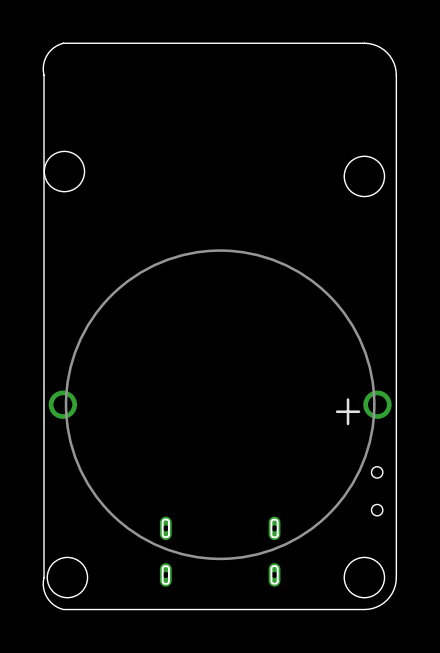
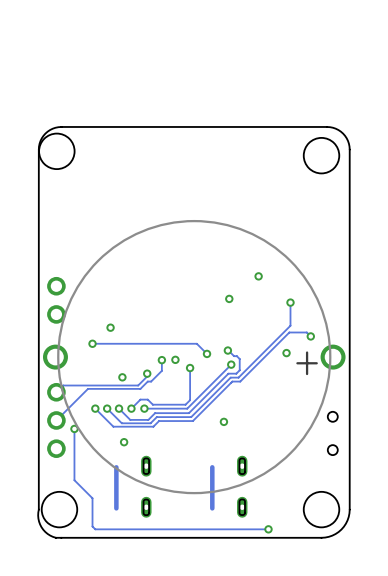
board edge: (396, 169) (395, 66) (389, 55) (383, 49) (372, 44) (364, 43) (60, 44) (49, 52) (43, 64) (44, 169) -> (349, 149) (347, 140) (343, 133) (335, 128) (327, 126) (58, 127) (50, 130) (43, 135) (38, 149)
via: none -> (258, 276)
via: none -> (229, 298)
part: none -> (56, 300)
track: none -> (290, 302) (290, 325) (238, 377) (230, 377) (191, 417) (156, 417) (150, 423) (121, 423) (107, 408)
via: none -> (290, 302)
via: none -> (110, 327)
track: none -> (310, 336) (306, 332) (289, 332) (240, 381) (232, 381) (192, 421) (159, 421) (153, 426) (113, 426) (95, 408)
via: none -> (310, 336)
track: none -> (92, 343) (196, 343) (207, 353)
via: none -> (92, 343)
track: none -> (227, 350) (239, 359) (239, 370) (236, 373) (228, 373) (188, 413) (155, 413) (148, 419) (130, 419) (119, 408)
via: none -> (227, 350)
via: none -> (286, 353)
via: none -> (207, 353)
via: none -> (175, 359)
track: none -> (161, 360) (161, 370) (140, 388) (88, 388) (56, 420)
via: none -> (161, 360)
track: none -> (231, 364) (187, 408) (144, 408)
via: none -> (231, 364)
track: none -> (190, 368) (190, 400) (185, 404) (152, 404) (147, 399) (140, 399) (131, 408)
via: none -> (190, 368)
track: none -> (147, 373) (147, 376) (138, 385) (63, 385) (56, 392)
via: none -> (147, 373)
via: none -> (122, 377)
via: none -> (95, 408)
via: none -> (107, 408)
via: none -> (119, 408)
via: none -> (131, 408)
via: none -> (144, 408)
part: none -> (56, 420)
via: none -> (223, 421)
track: none -> (74, 428) (74, 480) (92, 498) (92, 526) (95, 529) (268, 529)
via: none -> (74, 428)
via: none -> (124, 442)
track: none -> (116, 467) (116, 508)
track: none -> (212, 467) (212, 508)
via: none -> (268, 529)

